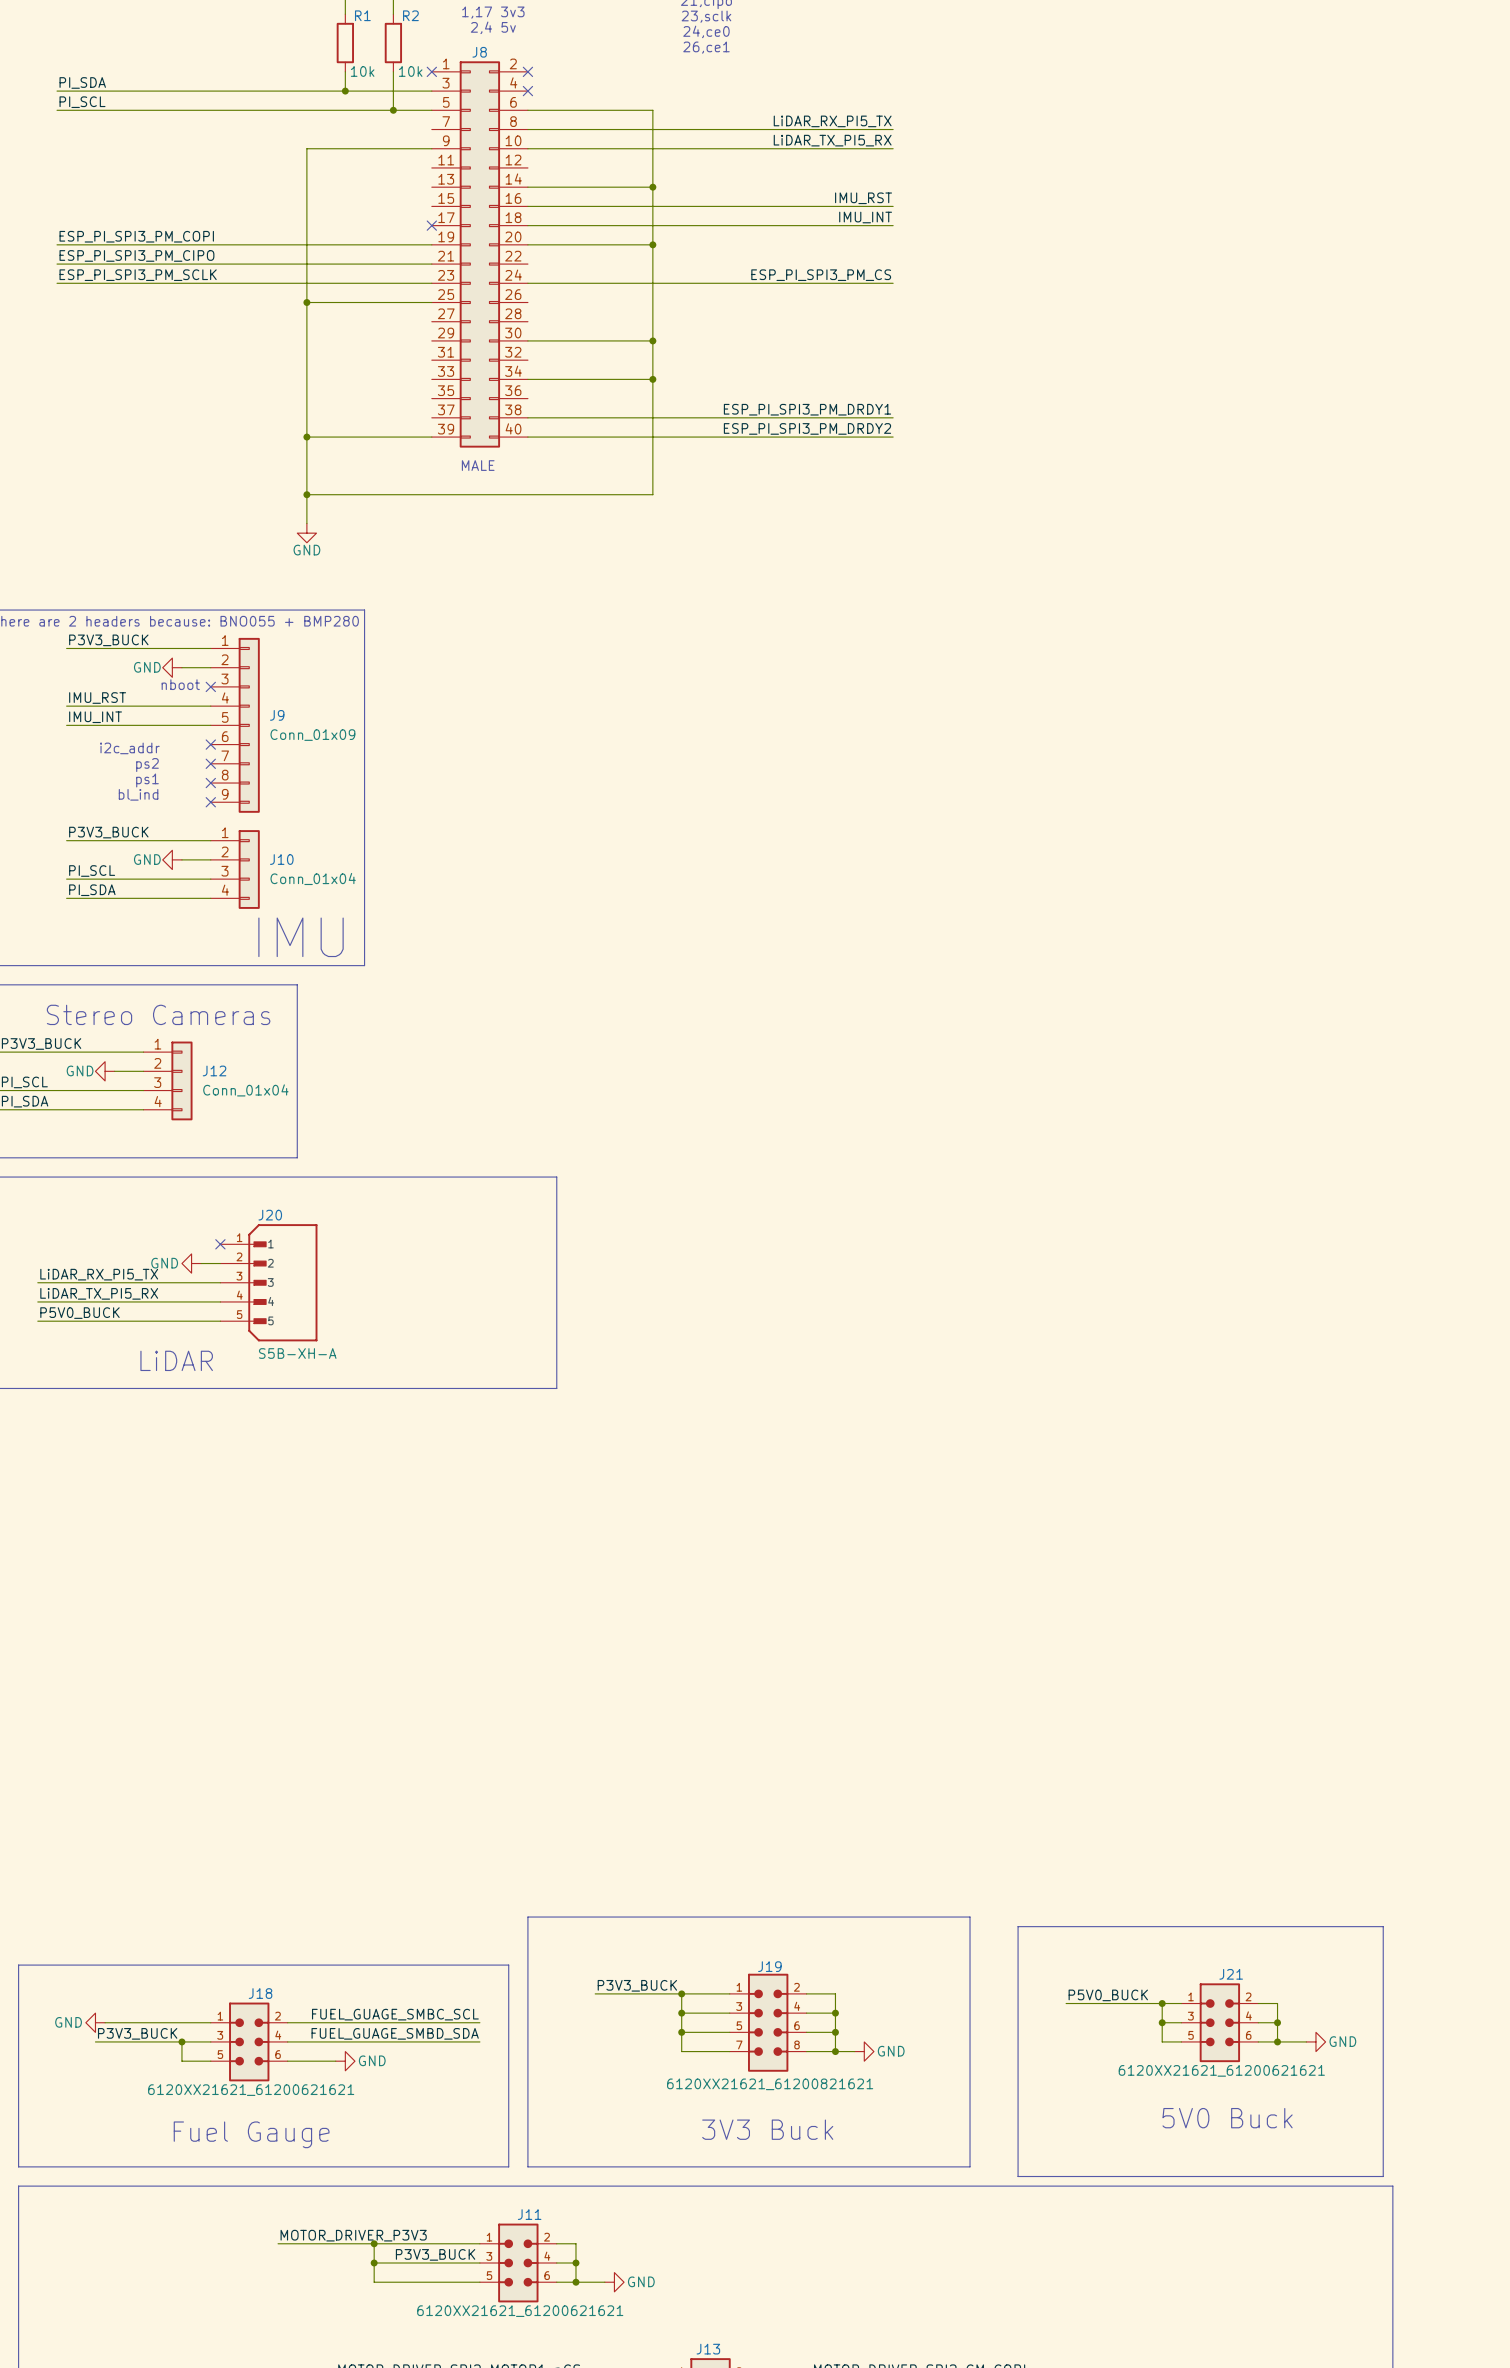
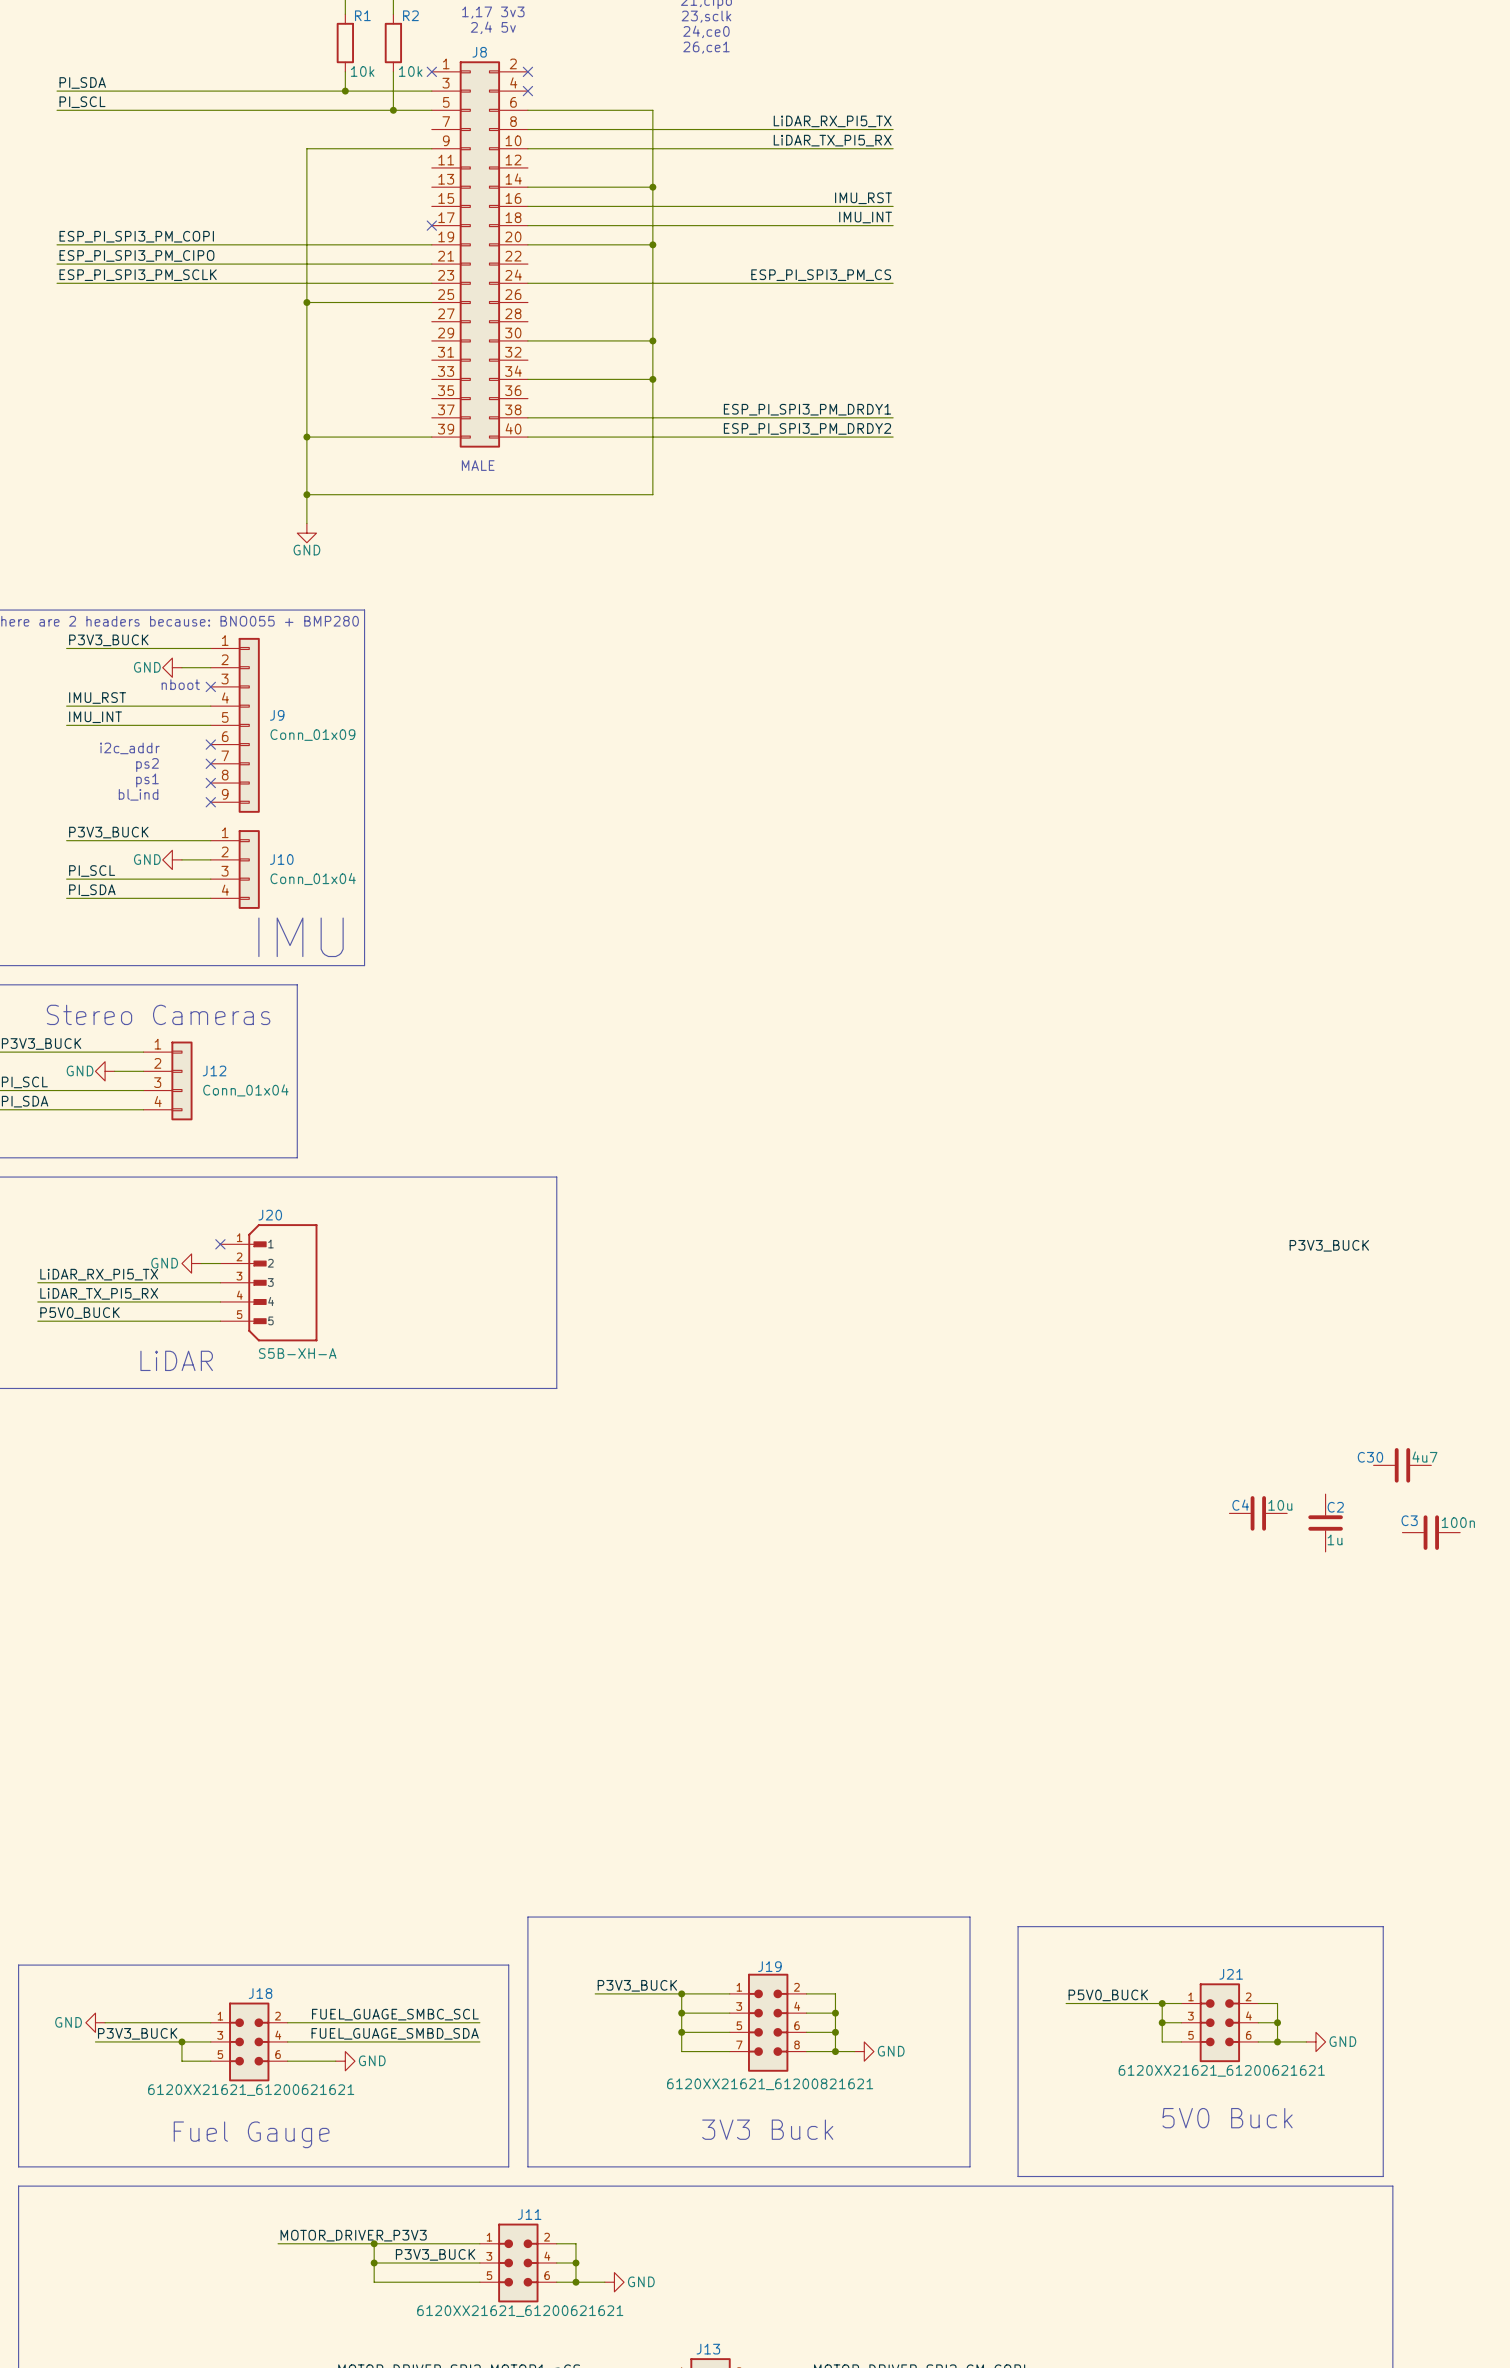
label: none -> P3V3_BUCK (1329, 1245)
C30: none -> 4u7 (1402, 1465)
C4: none -> 10u (1258, 1513)
C2: none -> 1u (1325, 1523)
C3: none -> 100n (1431, 1532)

